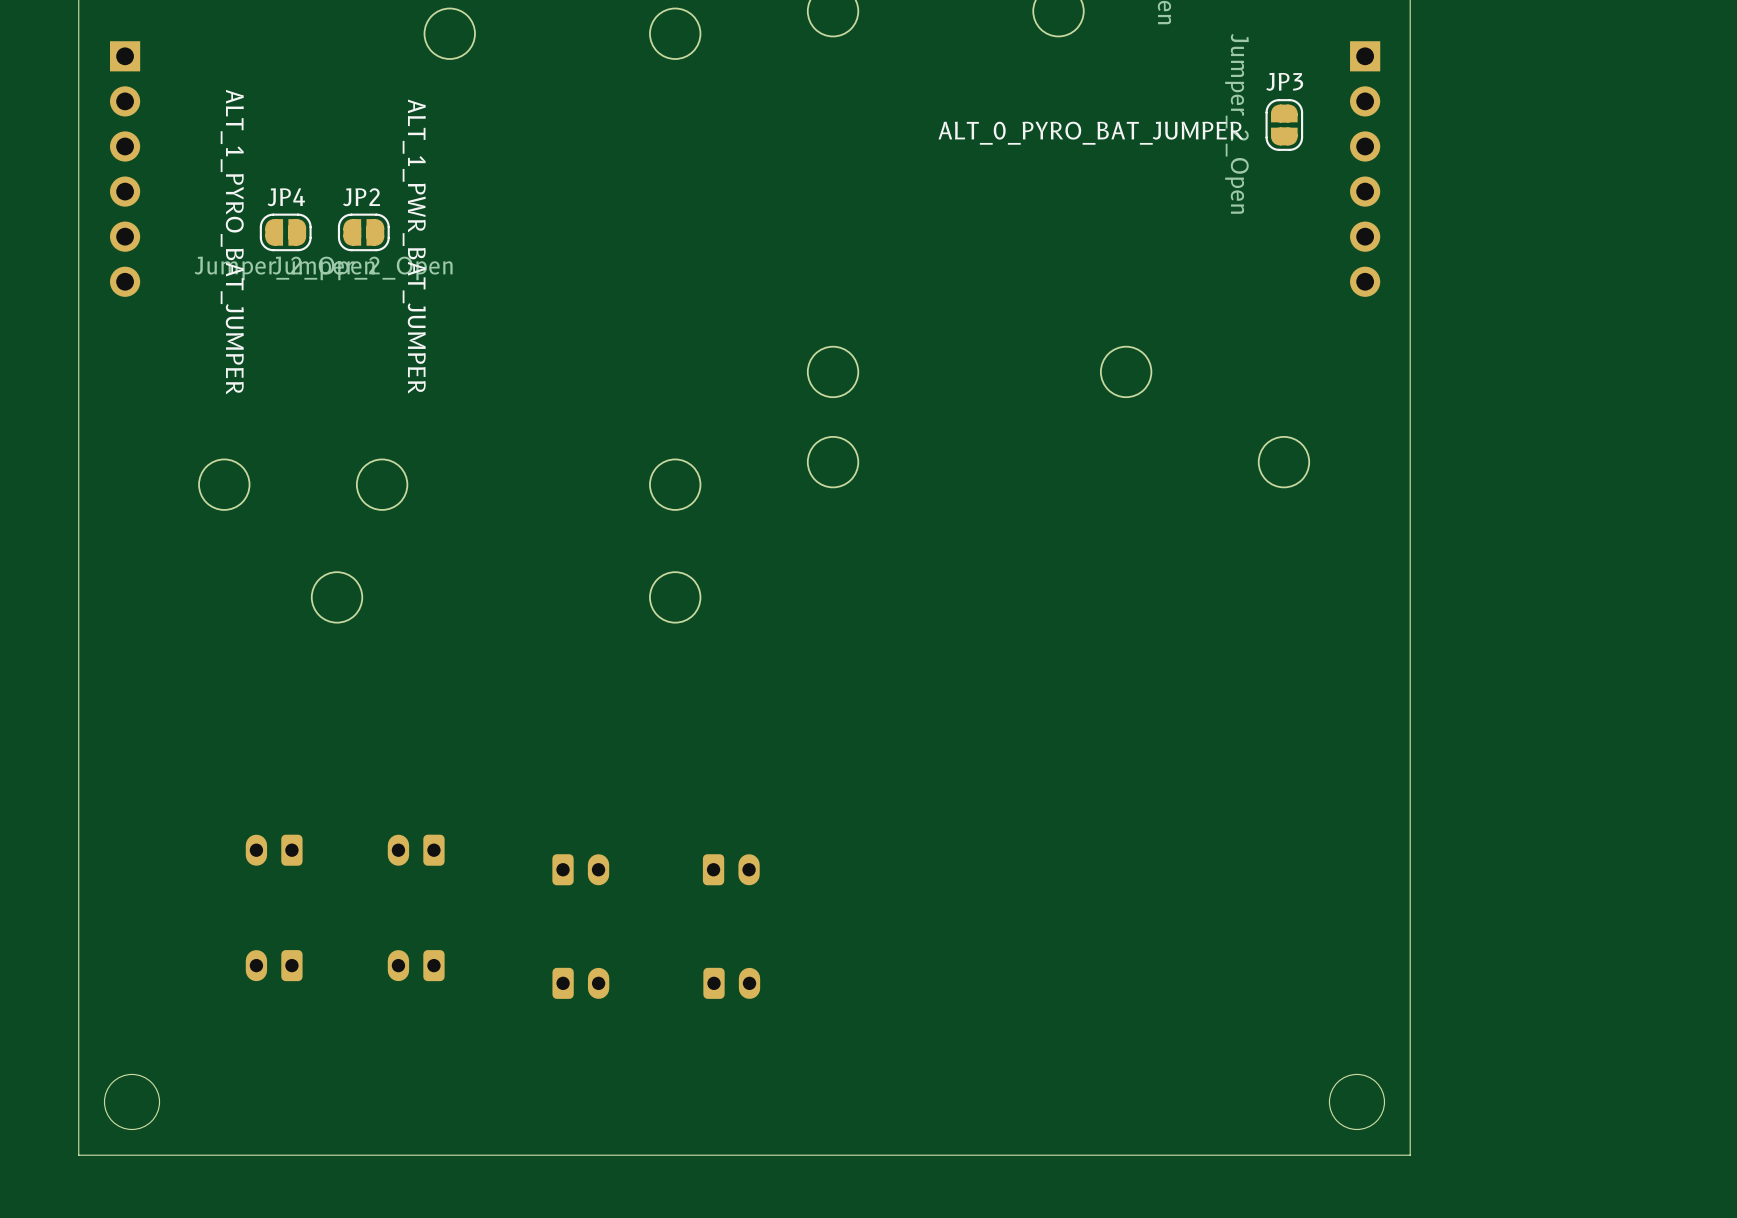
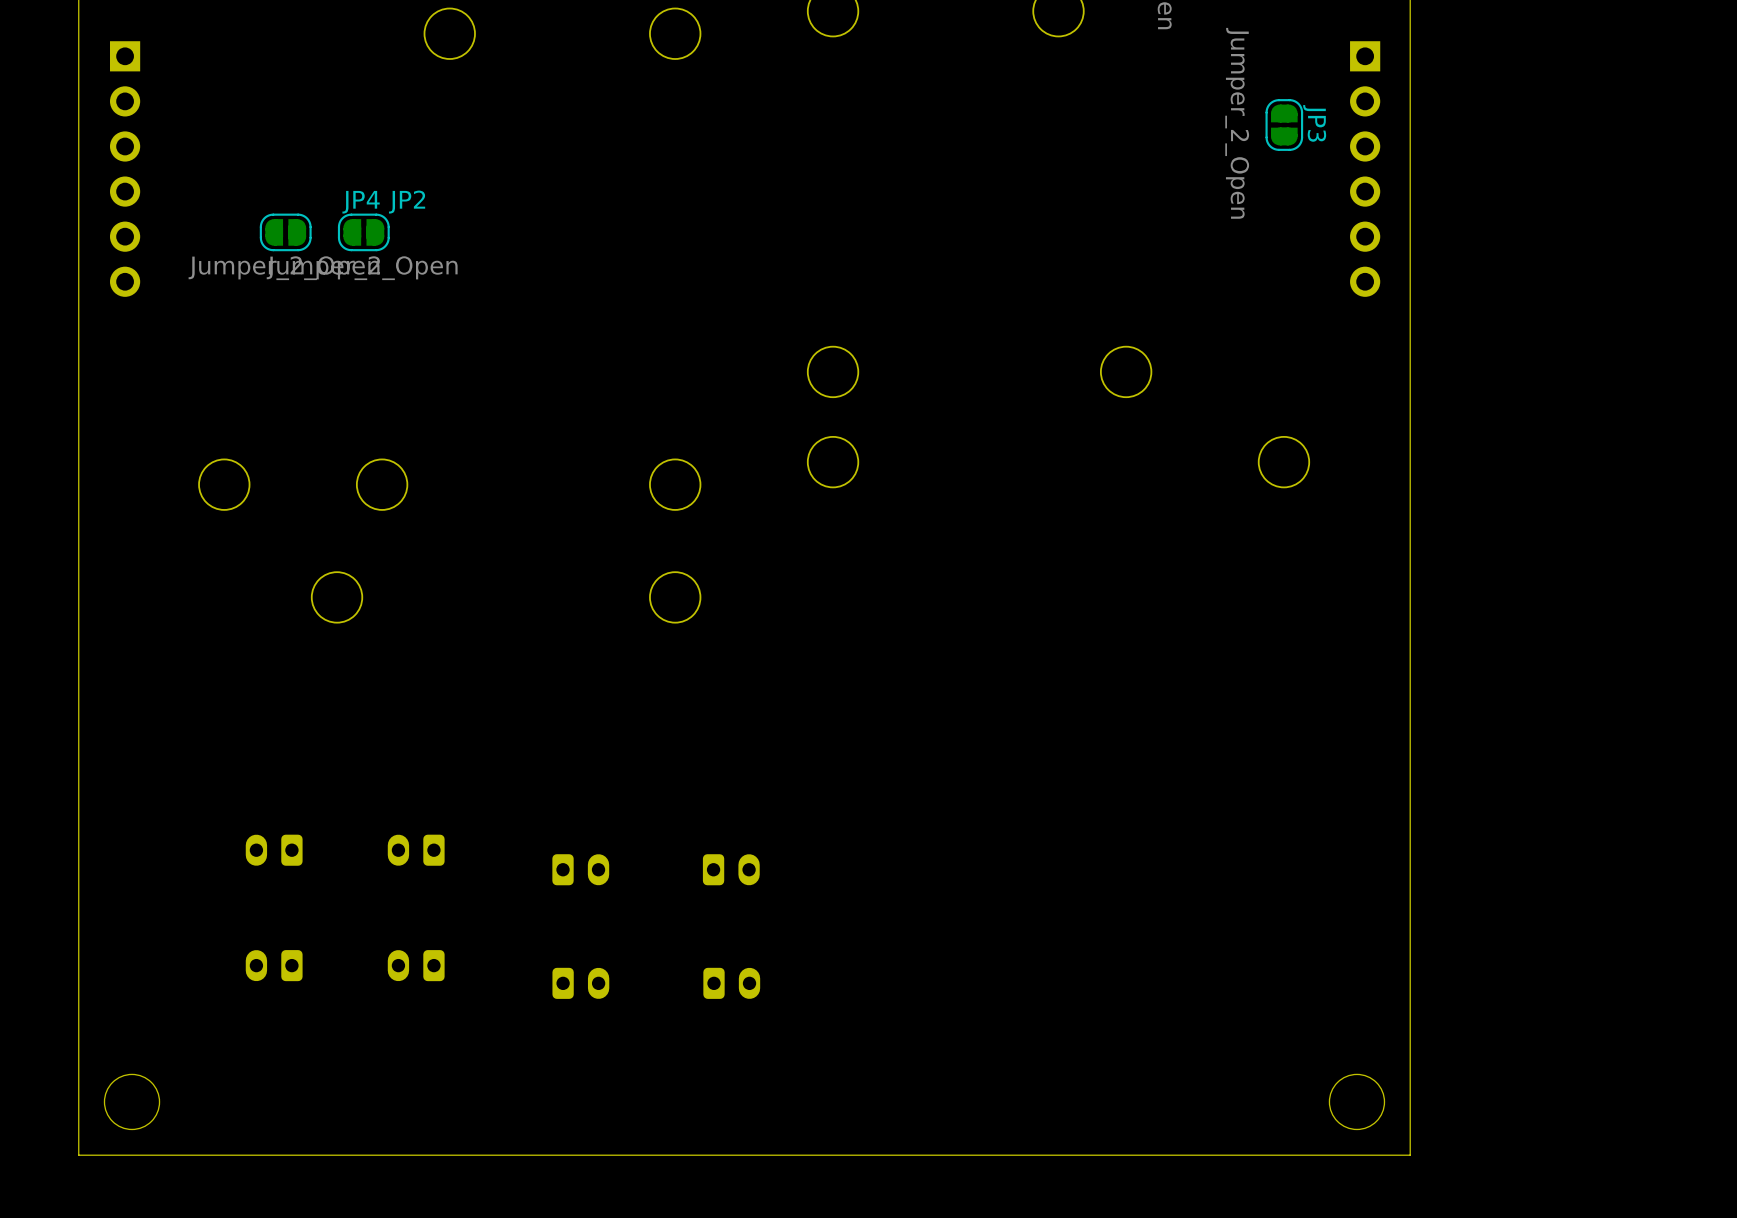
JP3 name rotation: 0° (1284, 81) -> 90° clockwise (1314, 123)
text: ALT_0_PYRO_BAT_JUMPER (1090, 133) -> none
JP4 name position: JP4 (286, 197) -> JP4 (361, 202)
JP2 name position: JP2 (361, 197) -> JP2 (407, 202)
text: ALT_1_PYRO_BAT_JUMPER (232, 242) -> none
text: ALT_1_PWR_BAT_JUMPER (414, 246) -> none

